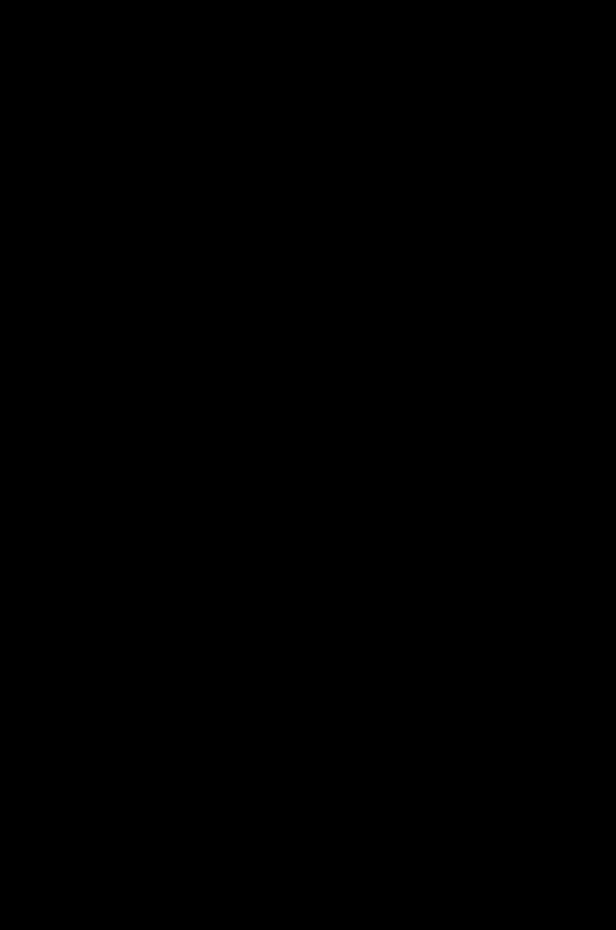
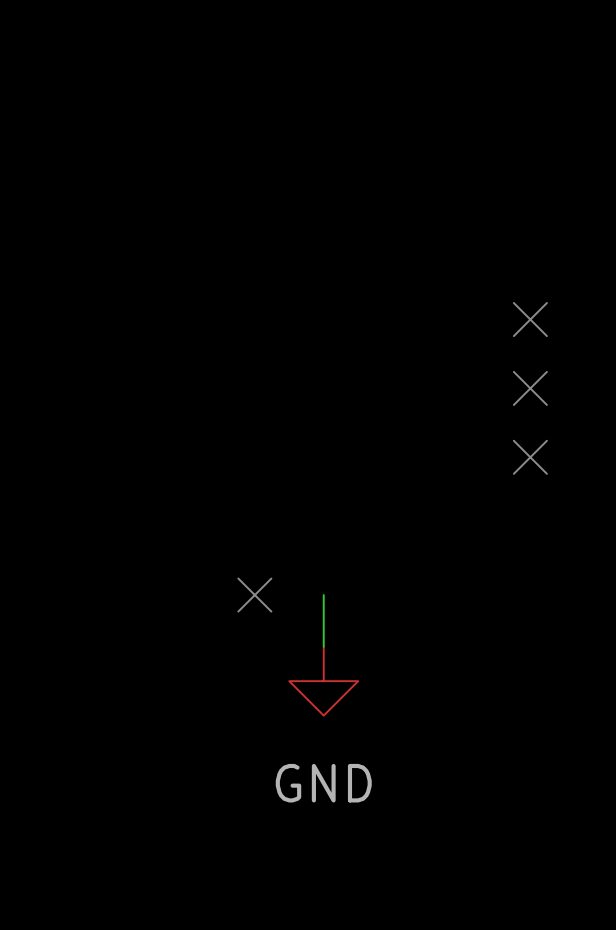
no-connect mark: none -> (530, 319)
no-connect mark: none -> (530, 388)
no-connect mark: none -> (530, 457)
no-connect mark: none -> (254, 595)
wire: none -> (323, 595) (323, 646)
power symbol: none -> GND (323, 681)

